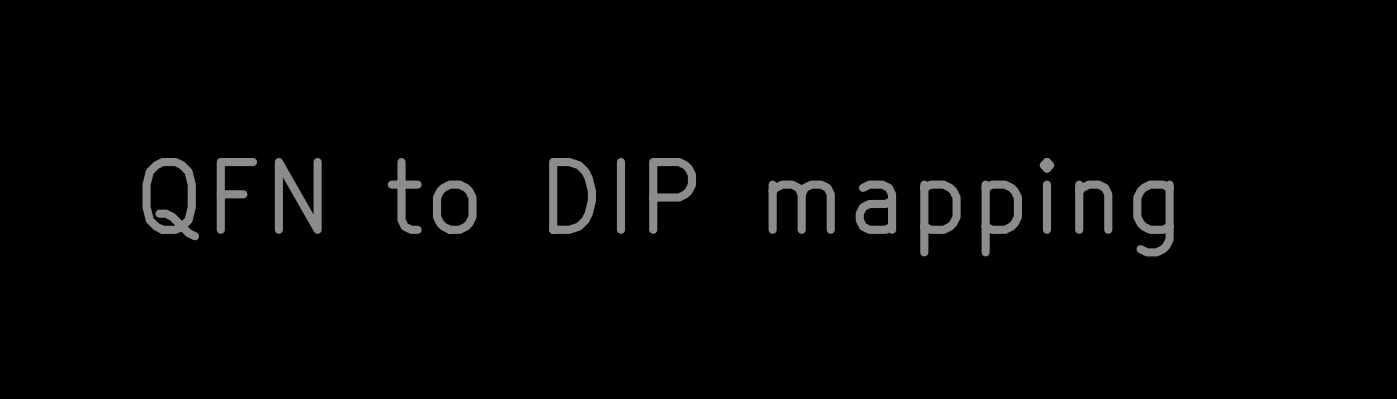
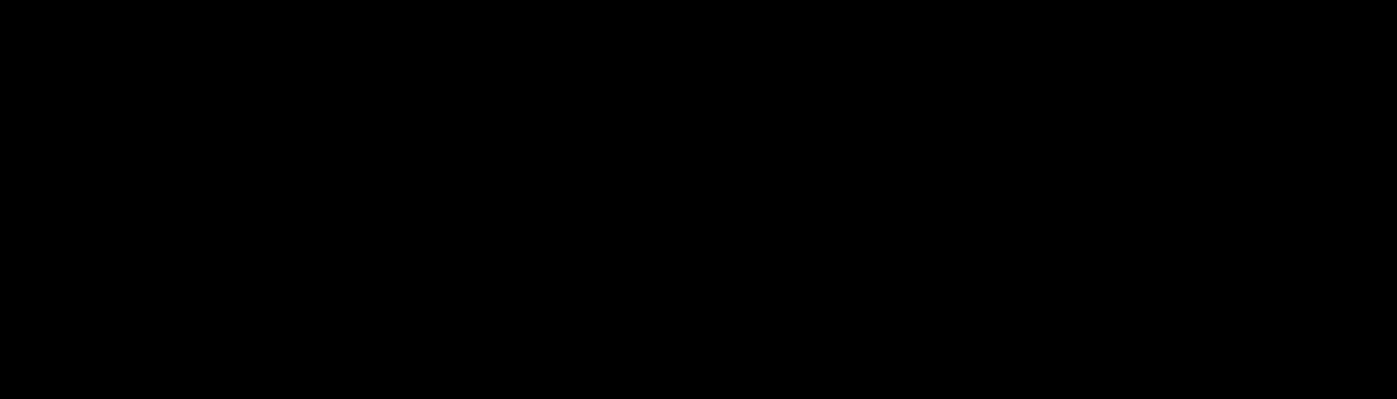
text: QFN to DIP mapping (658, 207) -> none

